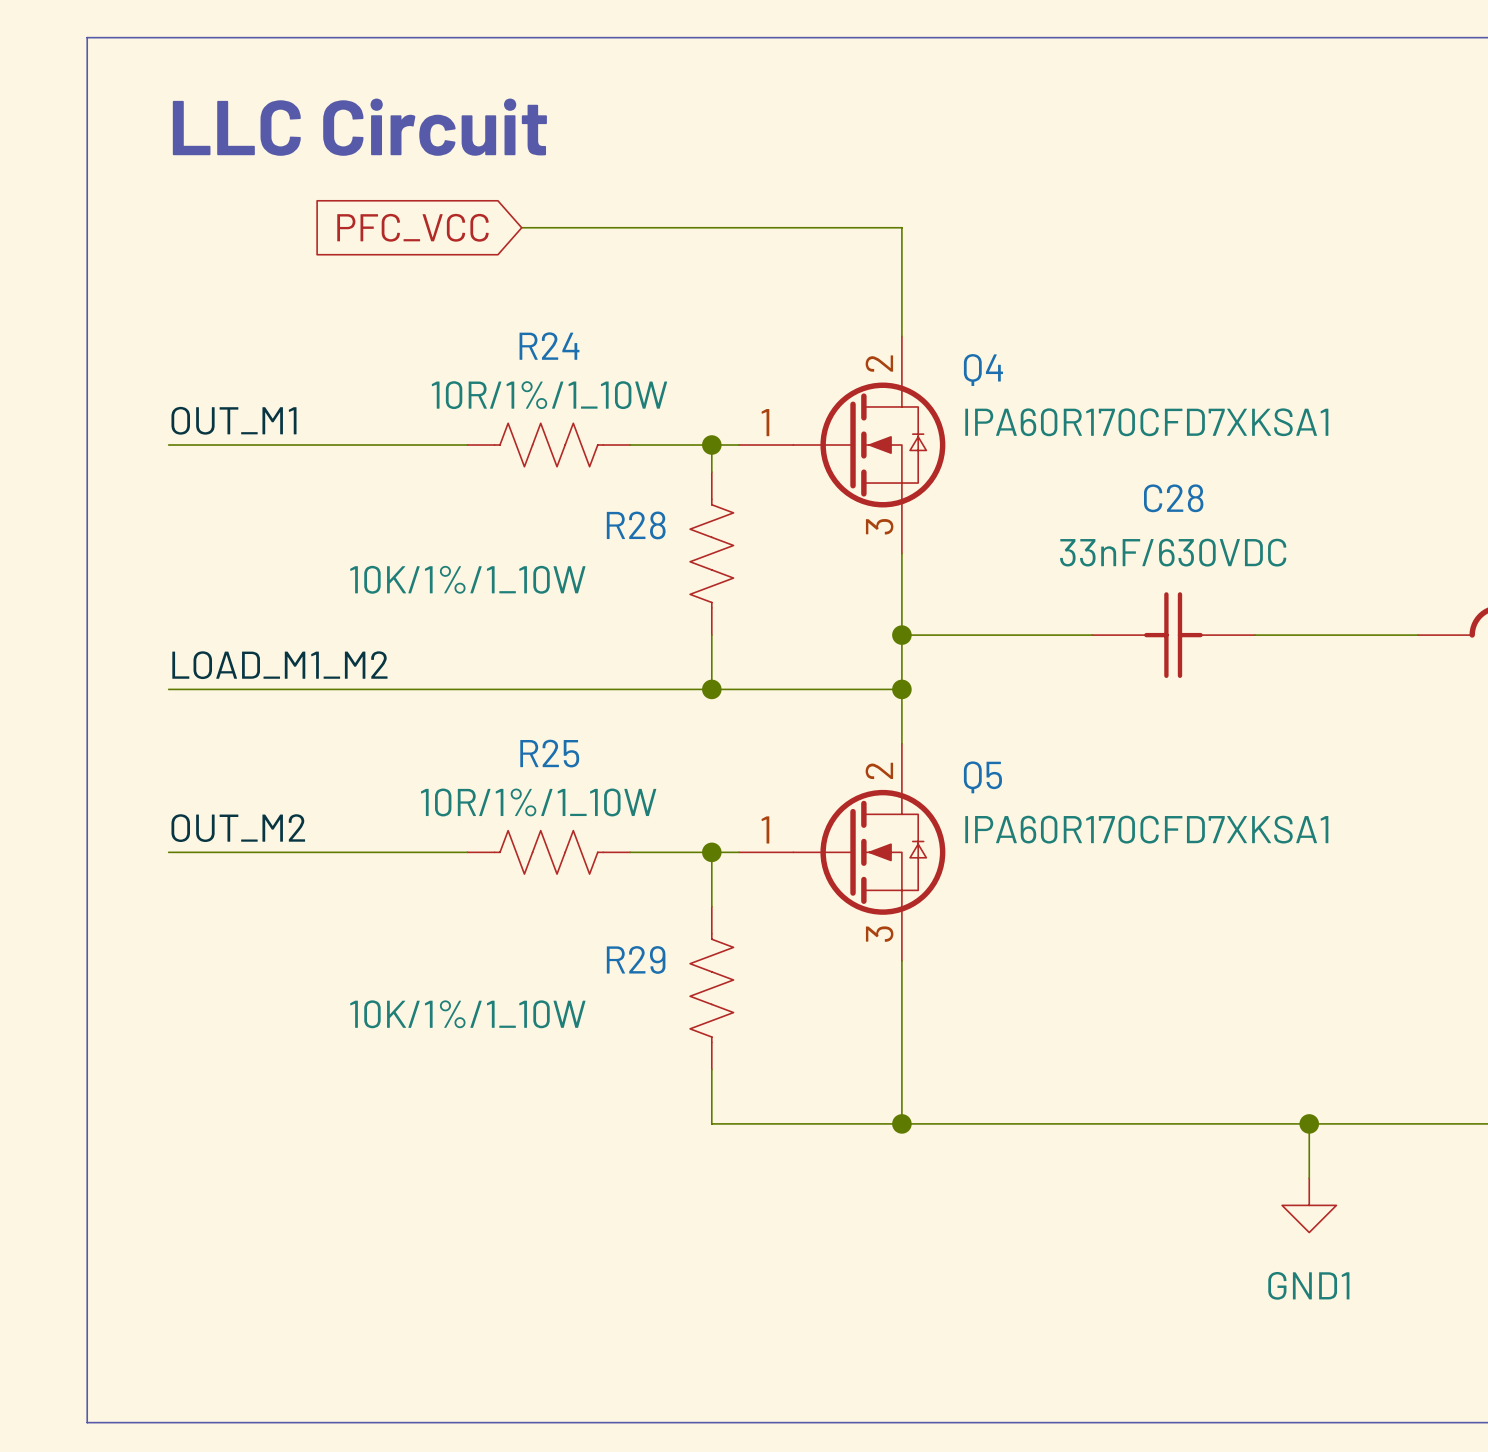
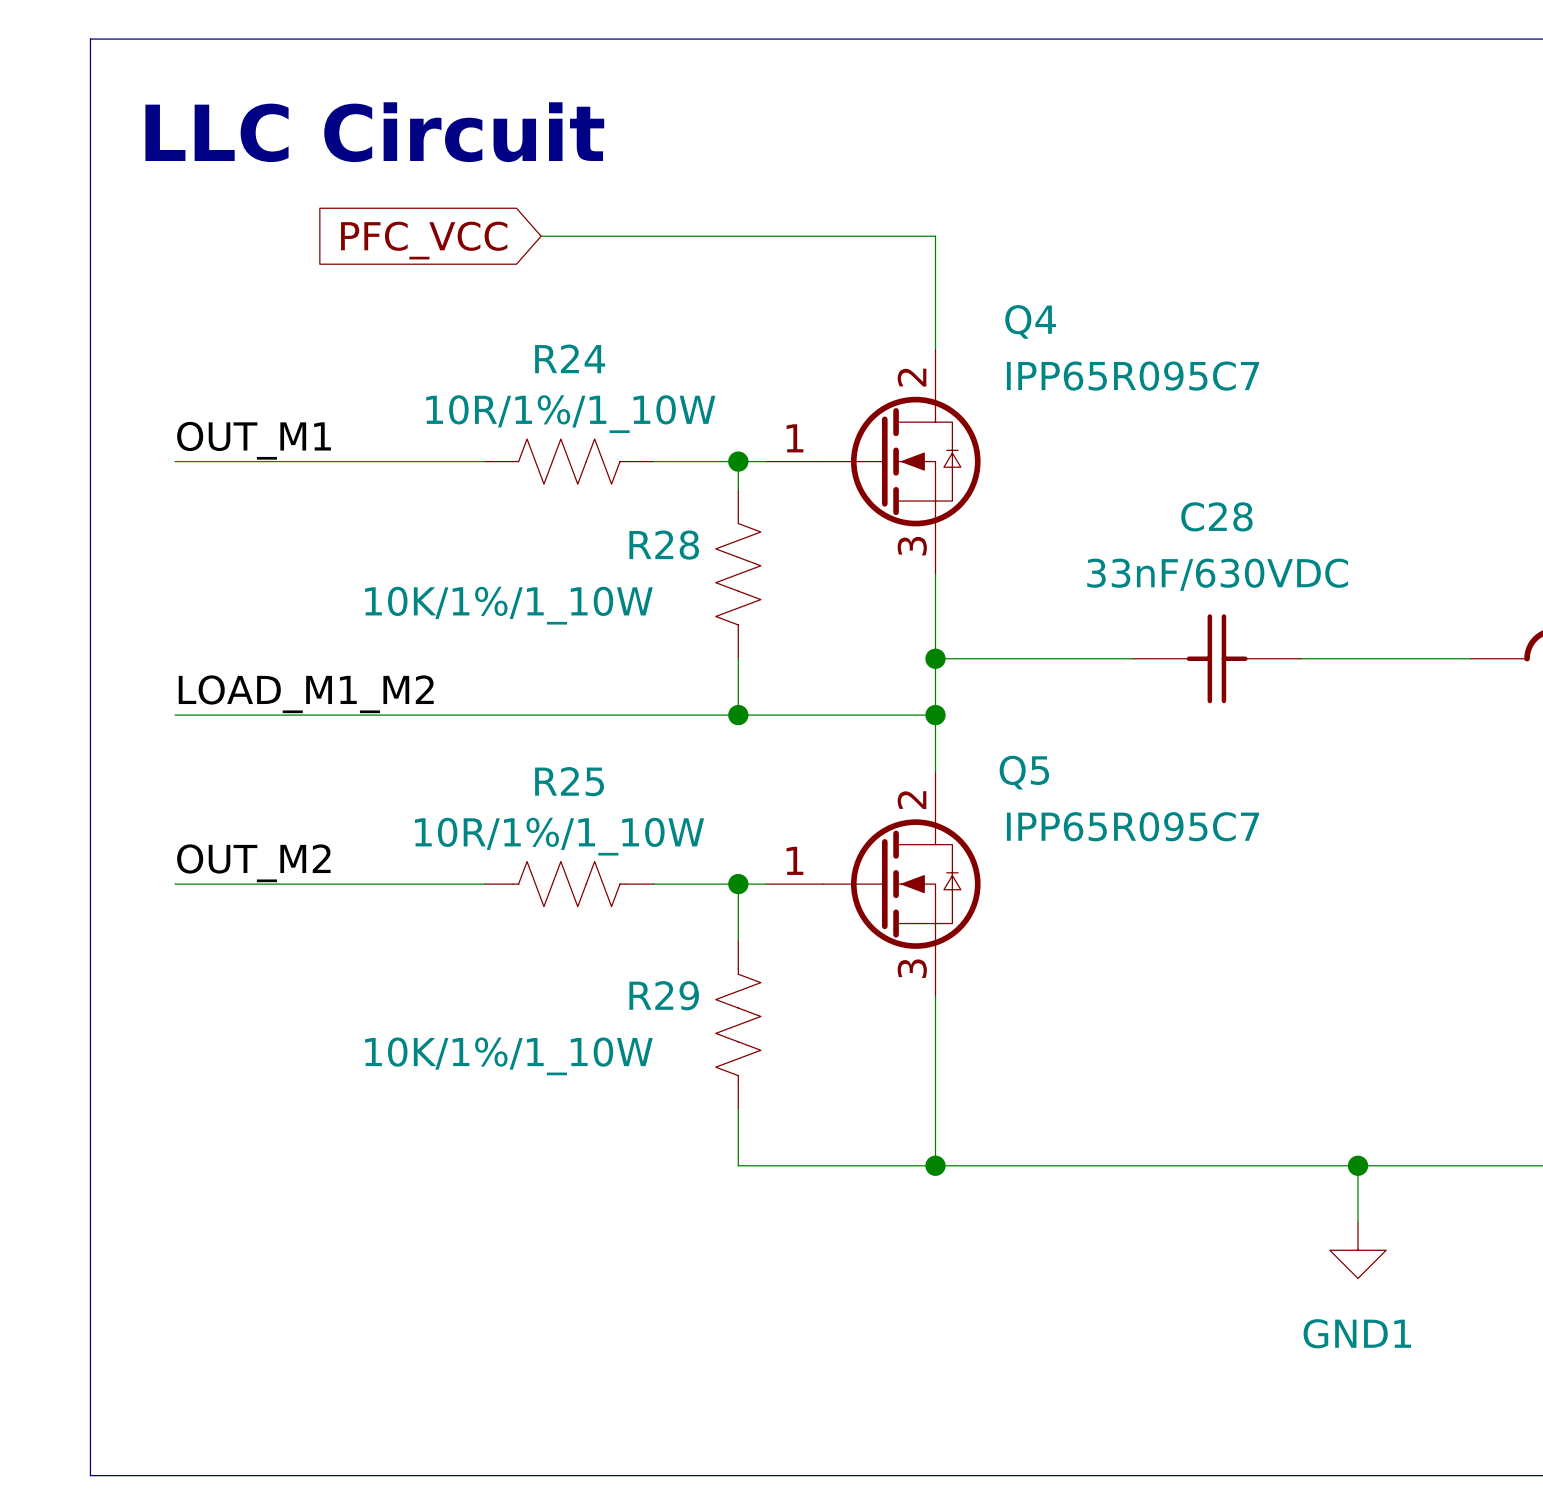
Q4 name position: Q4 (983, 370) -> Q4 (1030, 321)
Q4 value: IPA60R170CFD7XKSA1 (1146, 422) -> IPP65R095C7 (1132, 376)
Q5 name position: Q5 (982, 777) -> Q5 (1024, 772)
Q5 value: IPA60R170CFD7XKSA1 (1146, 829) -> IPP65R095C7 (1132, 826)

